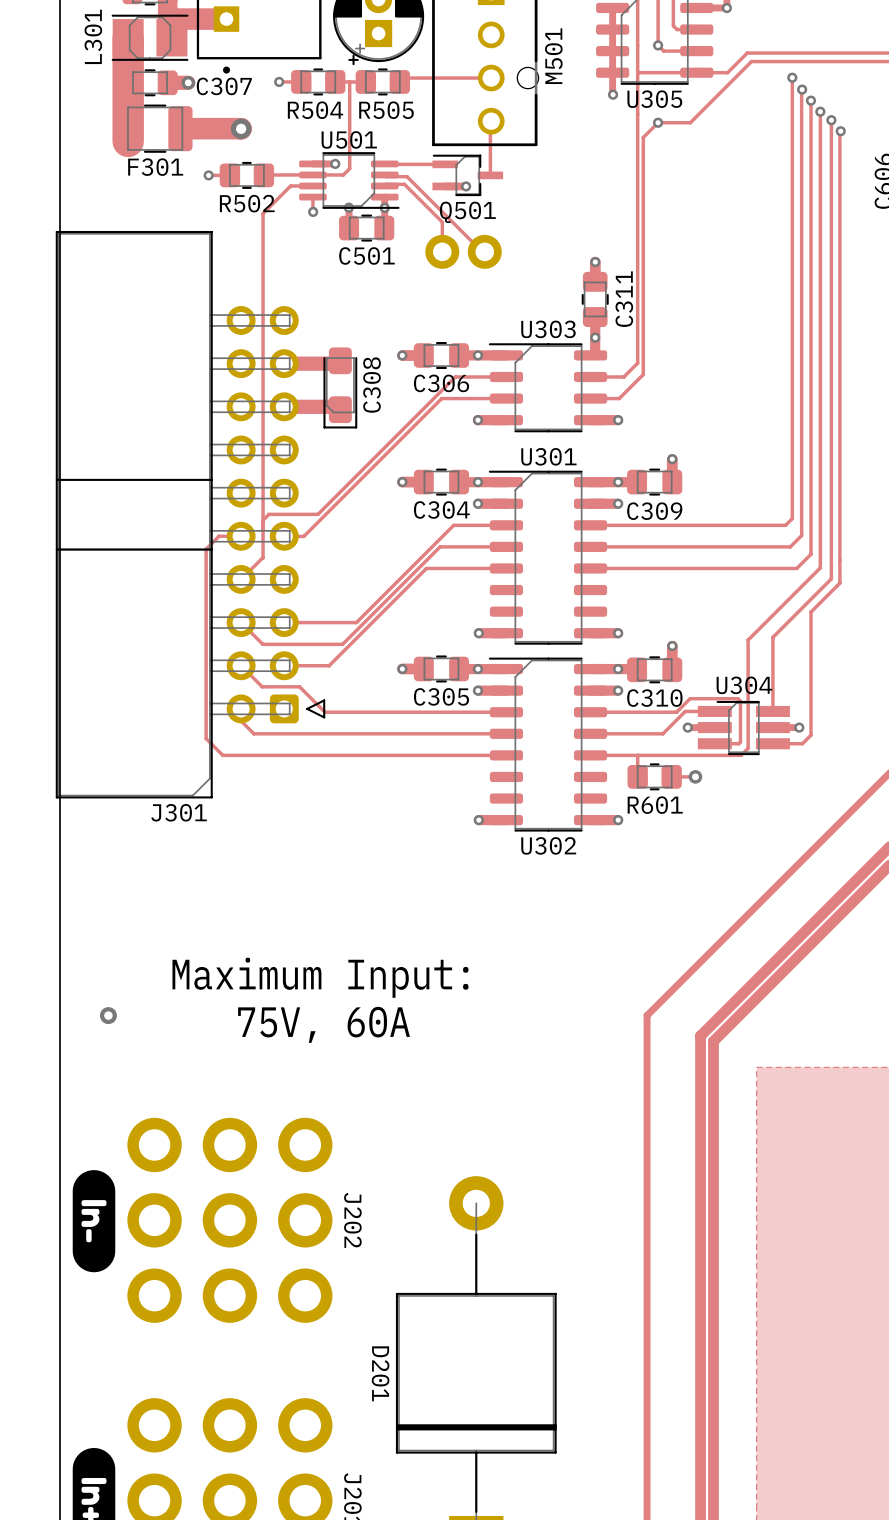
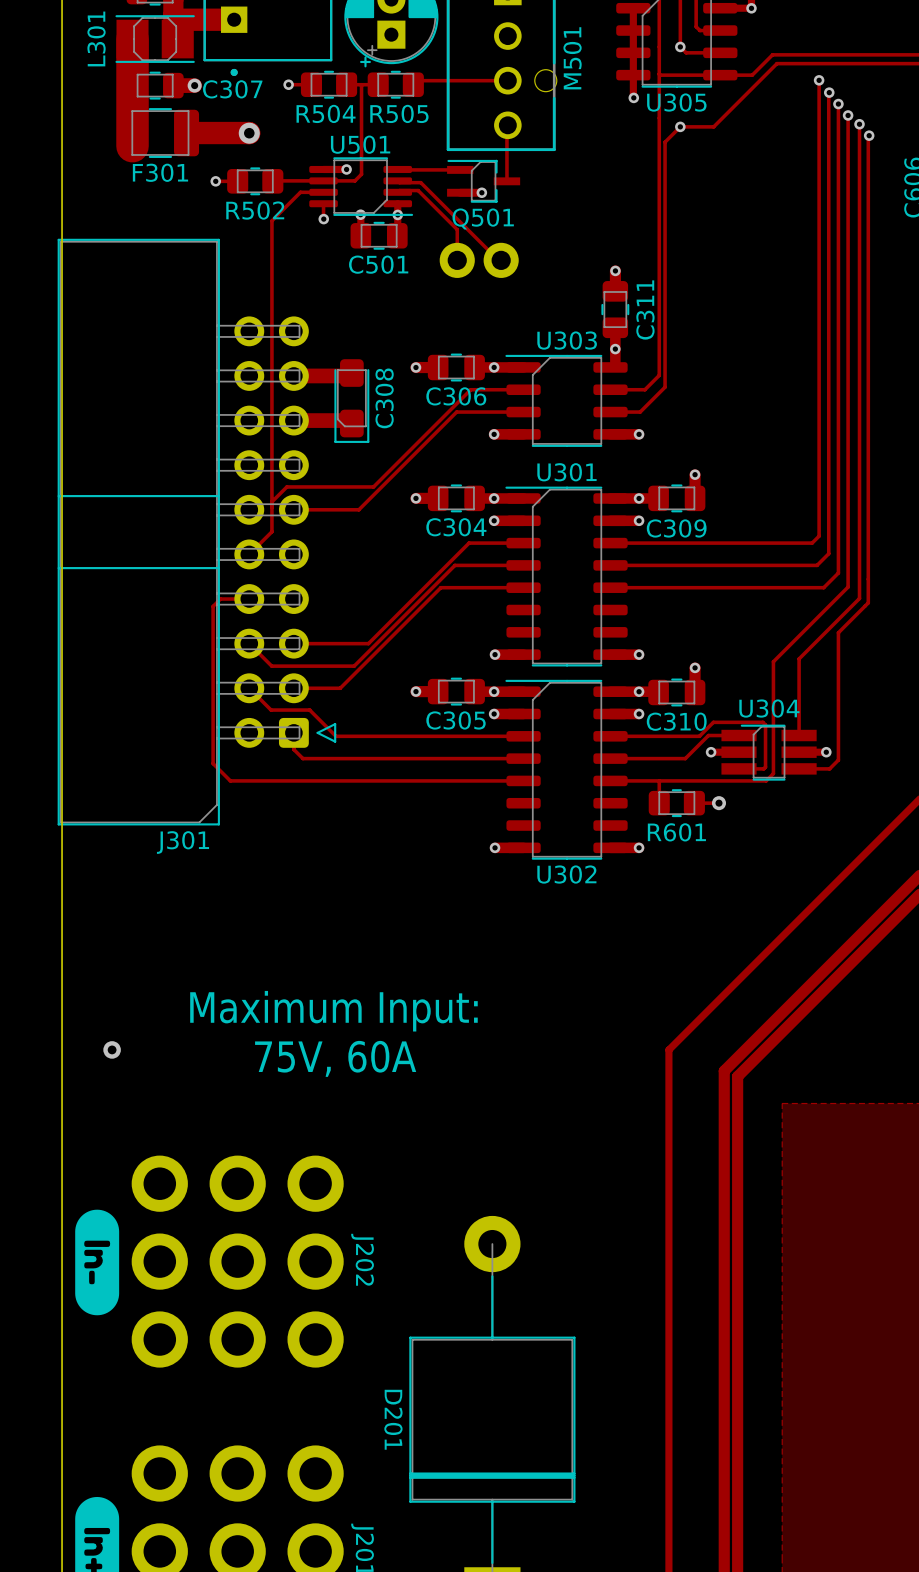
track: (361, 471) (317, 514) (268, 514) (263, 520) -> (373, 486) (286, 486) (271, 501)
track: (347, 493) (303, 536) (284, 536) -> (358, 509) (293, 509)
track: (263, 514) (263, 557) -> (271, 531) (249, 554)
track: (241, 536) (219, 536) (206, 549) (206, 586) -> (249, 599) (220, 599) (213, 606)
track: (262, 557) (241, 579) -> none
track: (241, 708) (241, 720) (253, 733) (293, 733) -> (293, 732) (293, 749) (302, 758)

